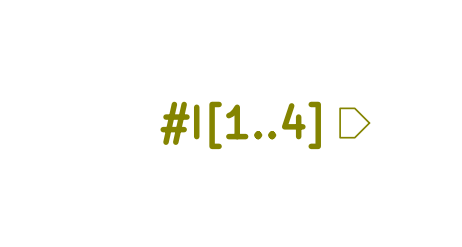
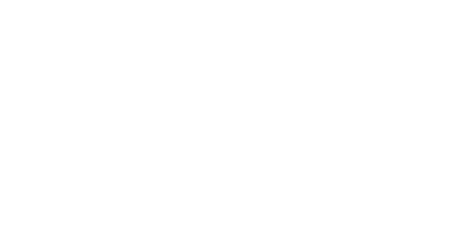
hierarchical label: #I[1..4] (240, 125) -> none

